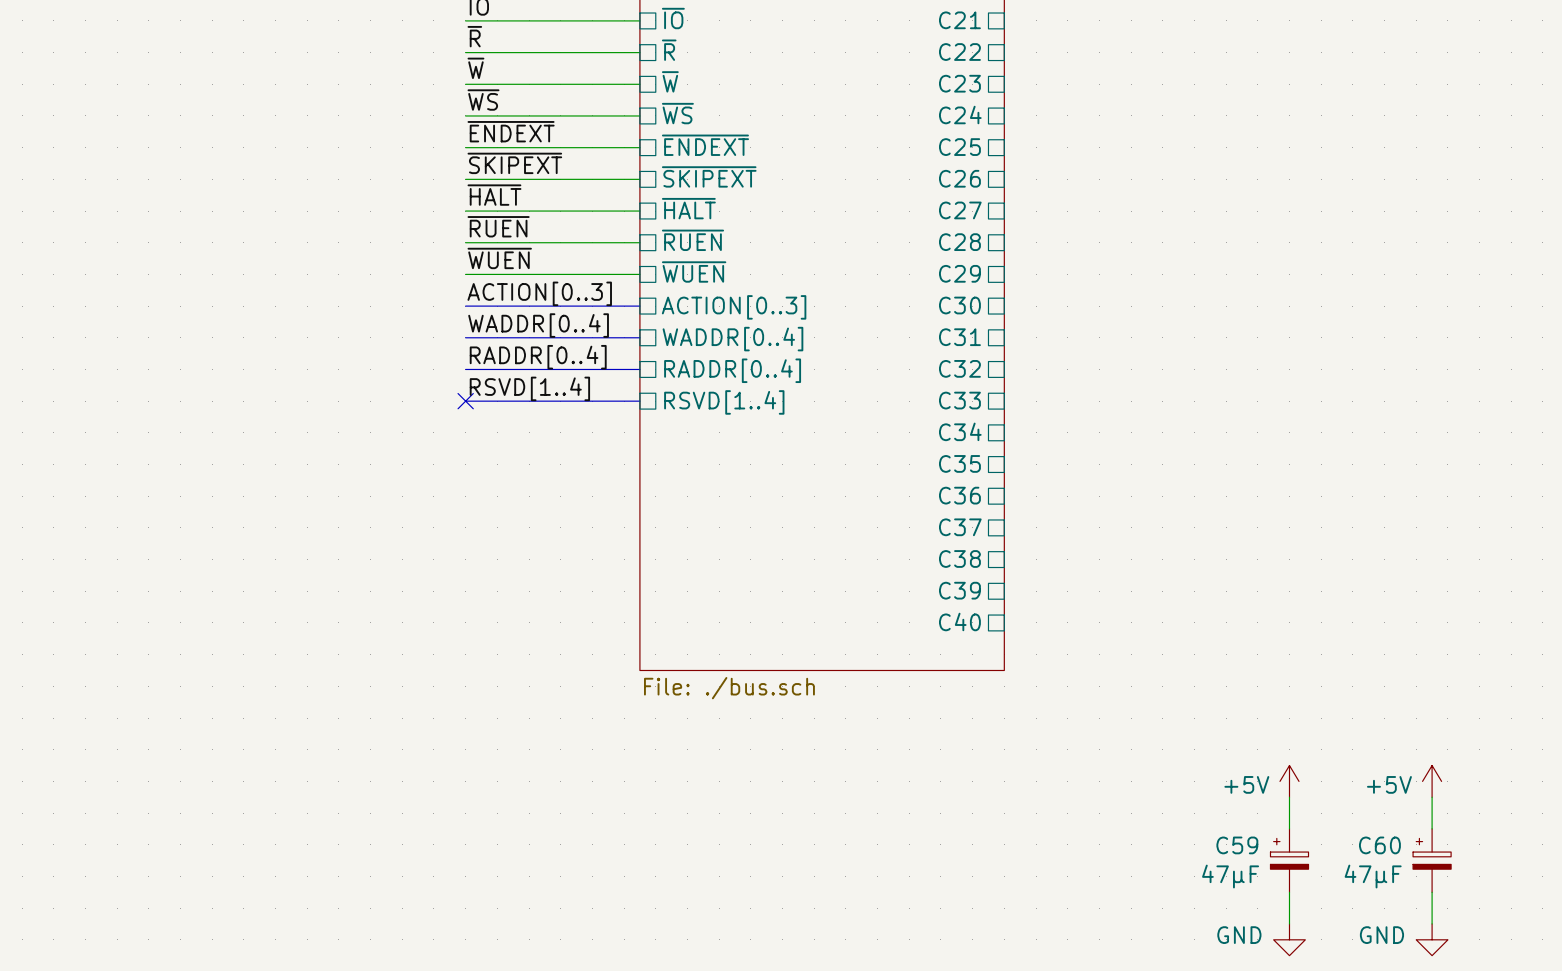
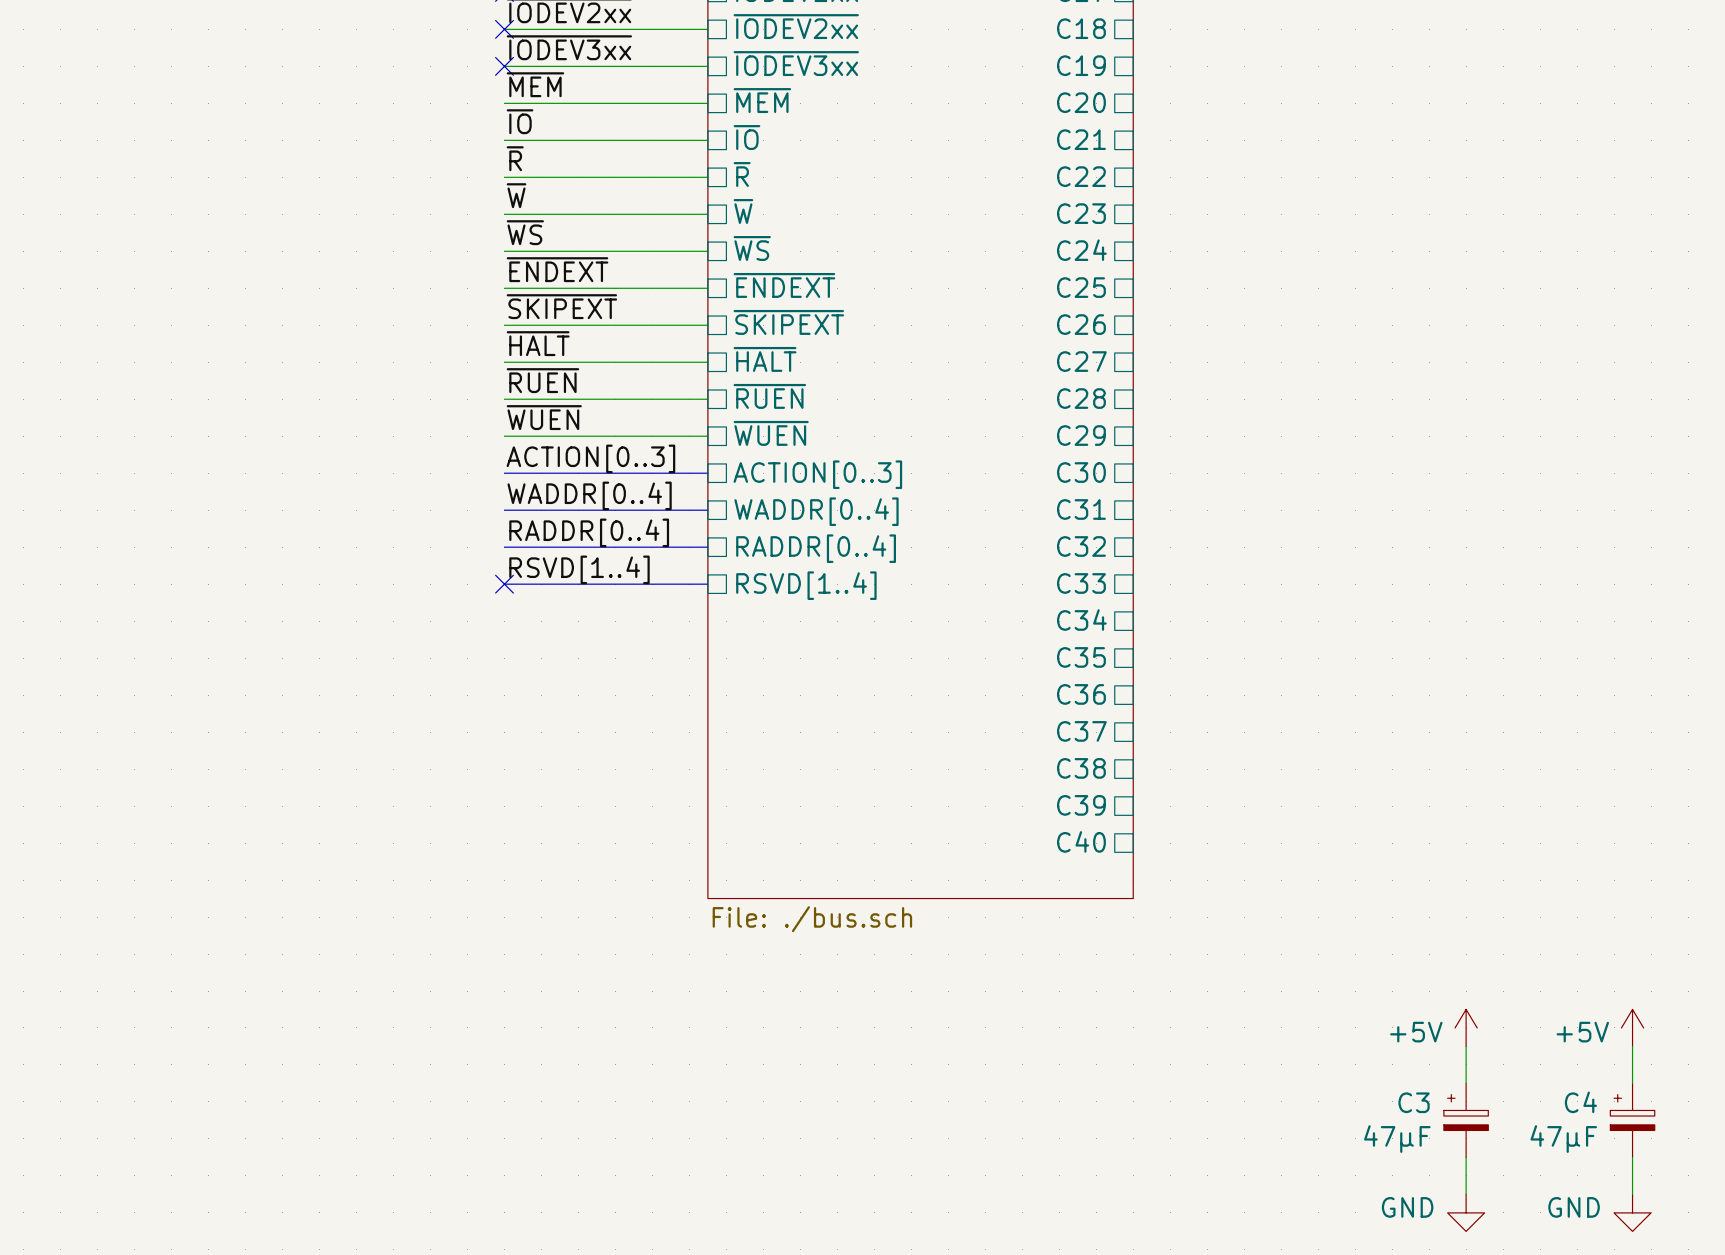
C59 name: C59 (1237, 845) -> C3 (1414, 1102)
C60 name: C60 (1379, 845) -> C4 (1580, 1102)

